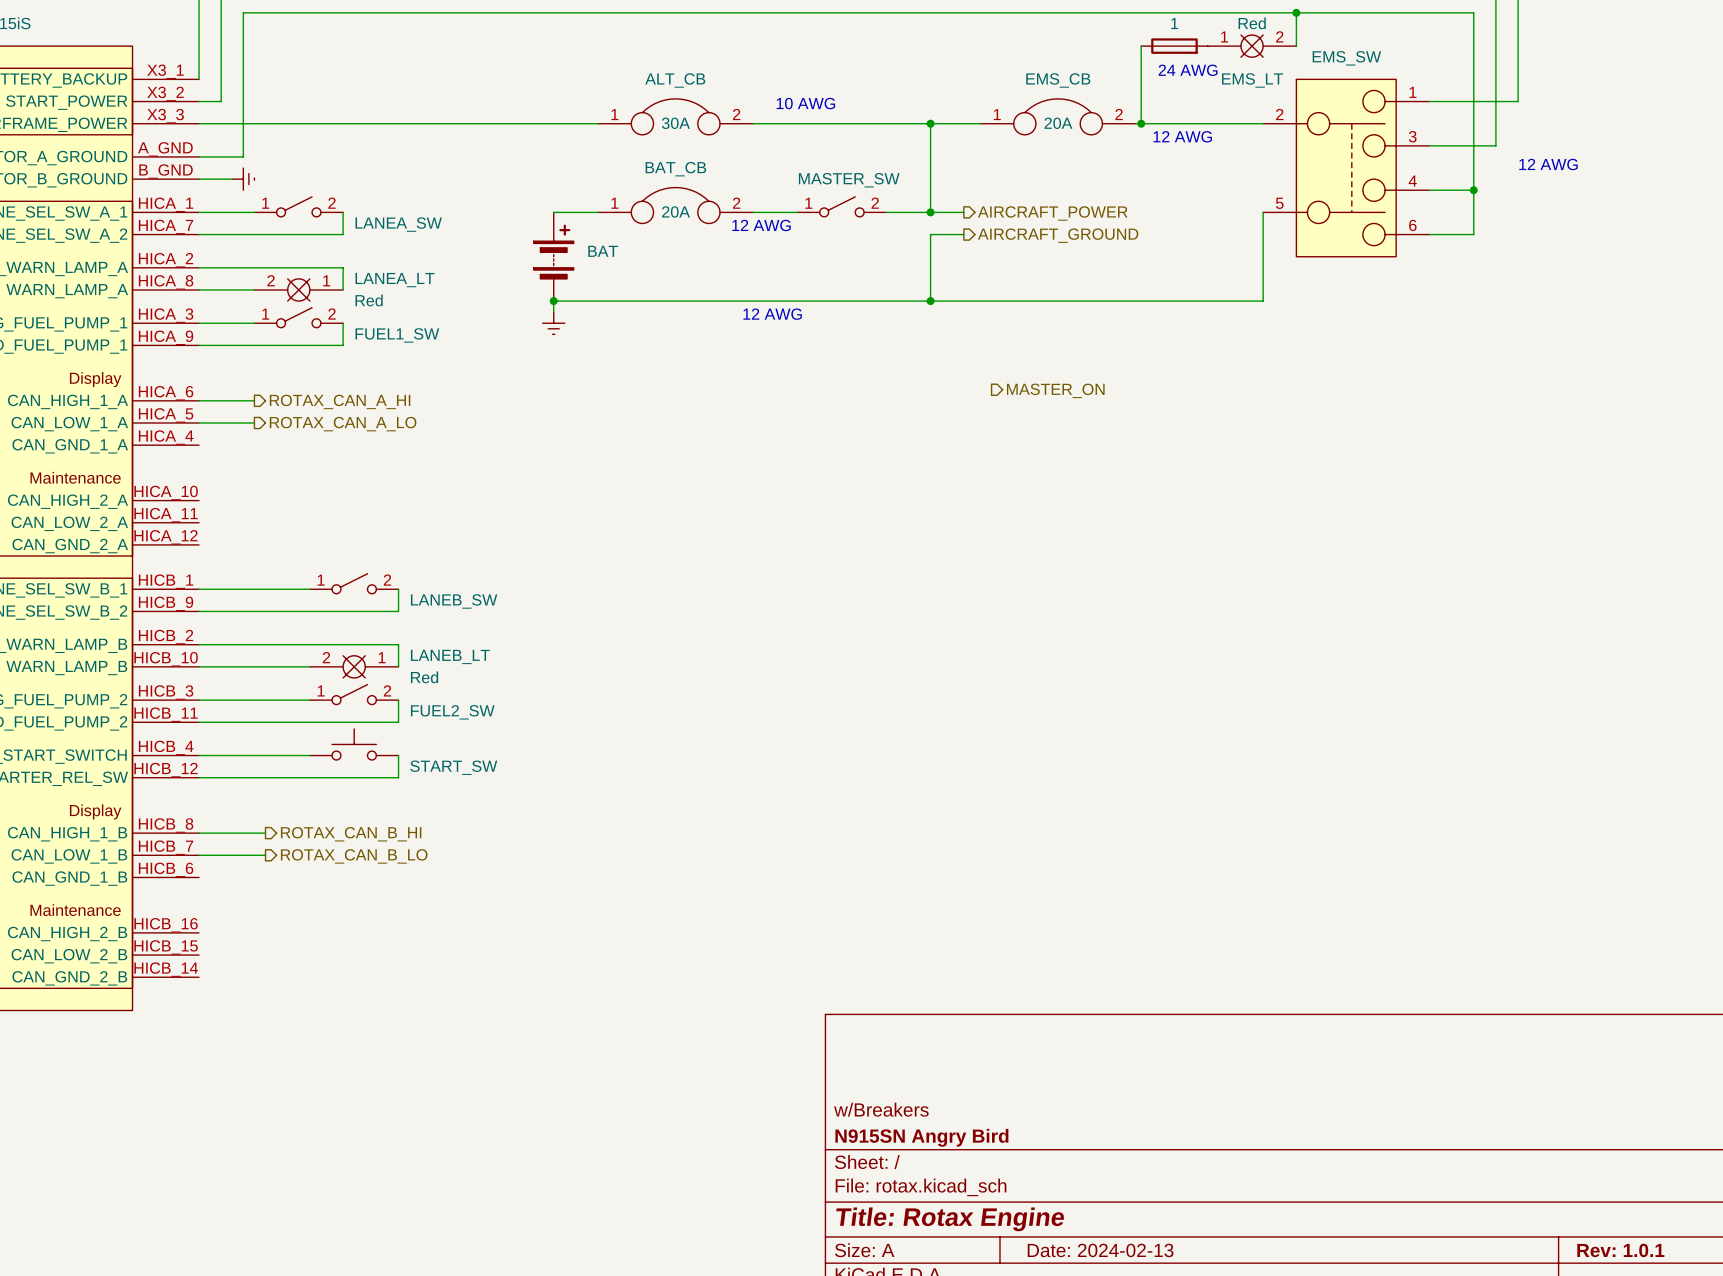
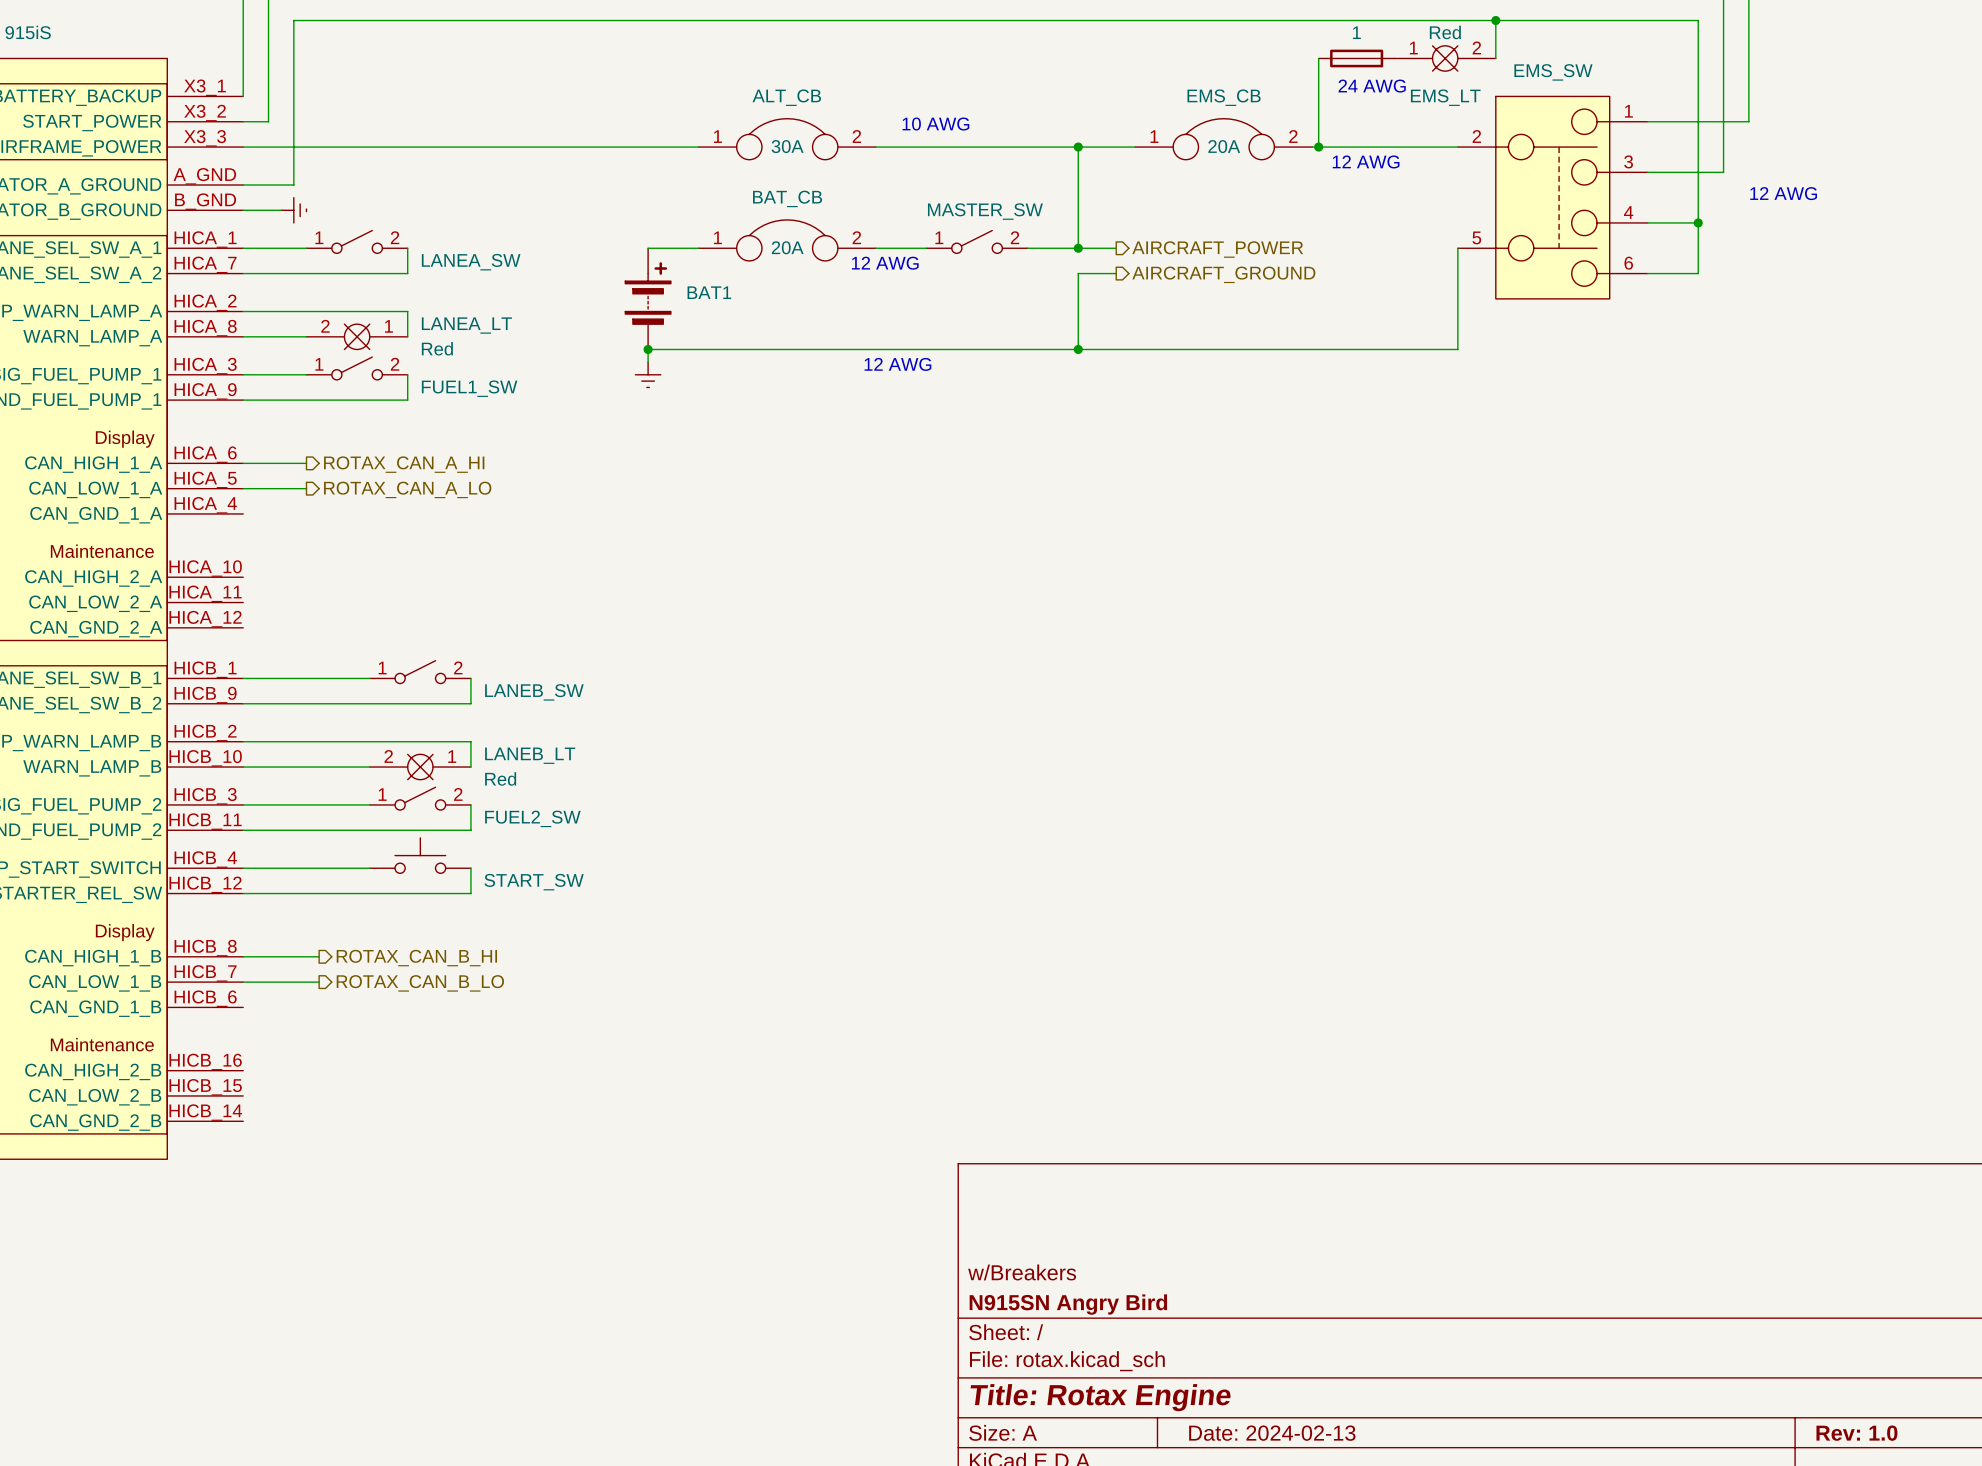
BAT name: BAT (603, 251) -> BAT1 (709, 292)
hierarchical label: MASTER_ON (1055, 390) -> none
title block: Rev: 1.0.1 (1620, 1250) -> Rev: 1.0 (1856, 1433)

